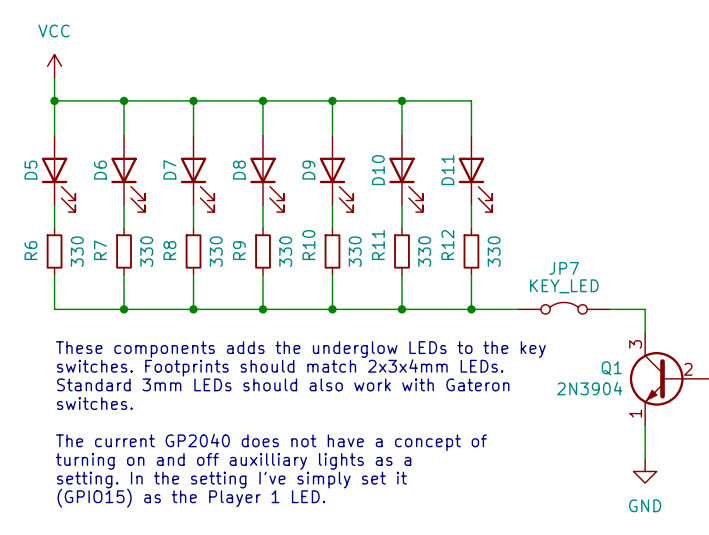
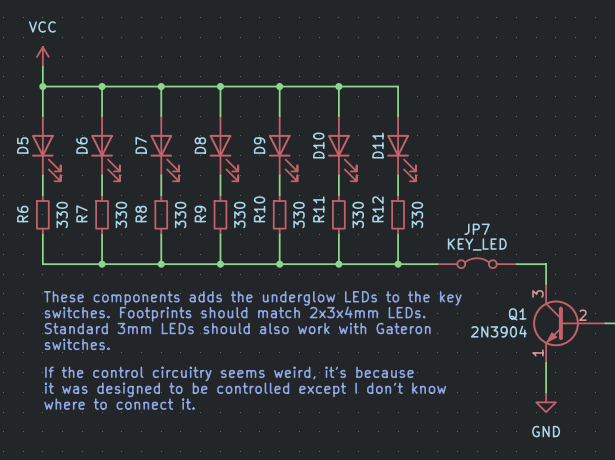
text: The current GP2040 does not have a concept of (271, 442) -> If the control circuitry seems weird, it's because (229, 373)
text: turning on and off auxilliary lights as a (233, 461) -> it was designed to be controlled except I don't know (245, 389)
text: setting. In the setting I've simply set it (231, 480) -> where to connect it. (119, 404)
text: (GPIO15) as the Player 1 LED. (191, 498) -> none

